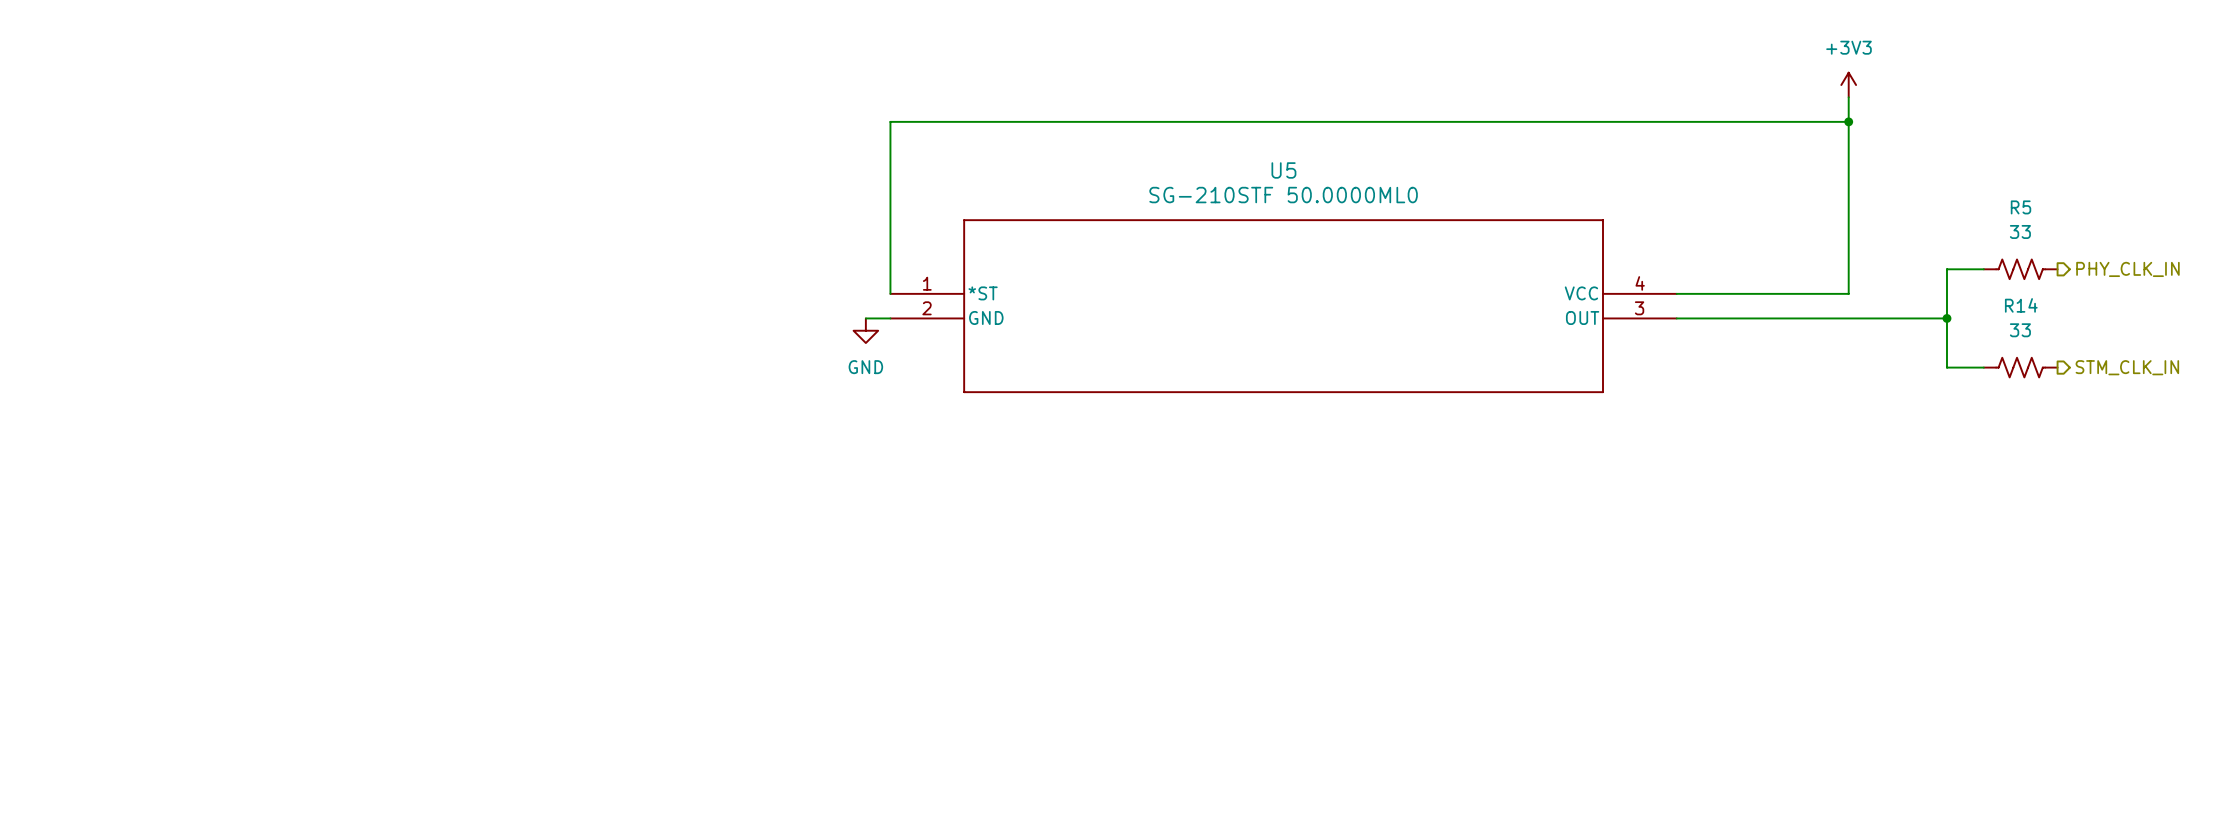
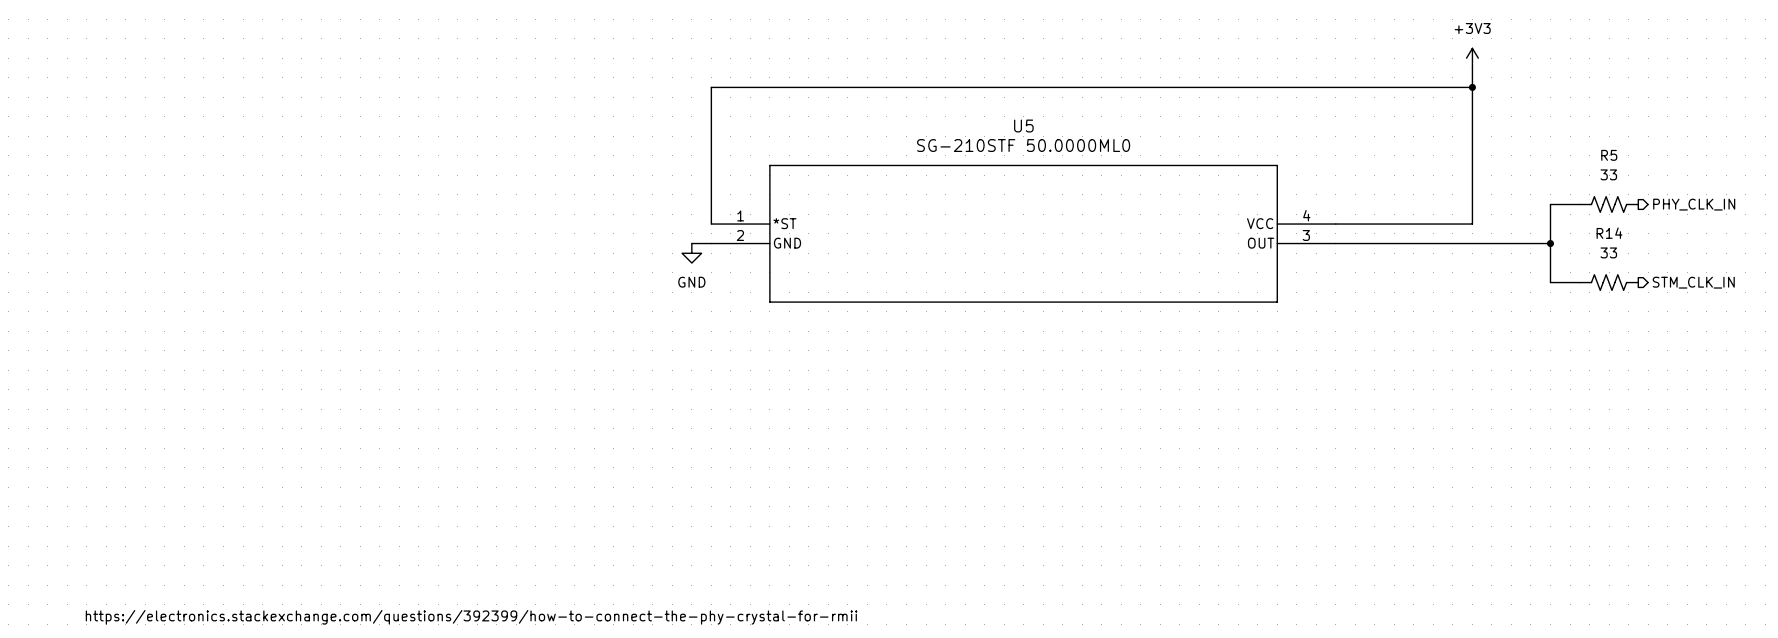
text: none -> https://electronics.stackexchange.com/questions/392399/how-to-connect-the-phy-crystal-for-rmii (471, 617)

